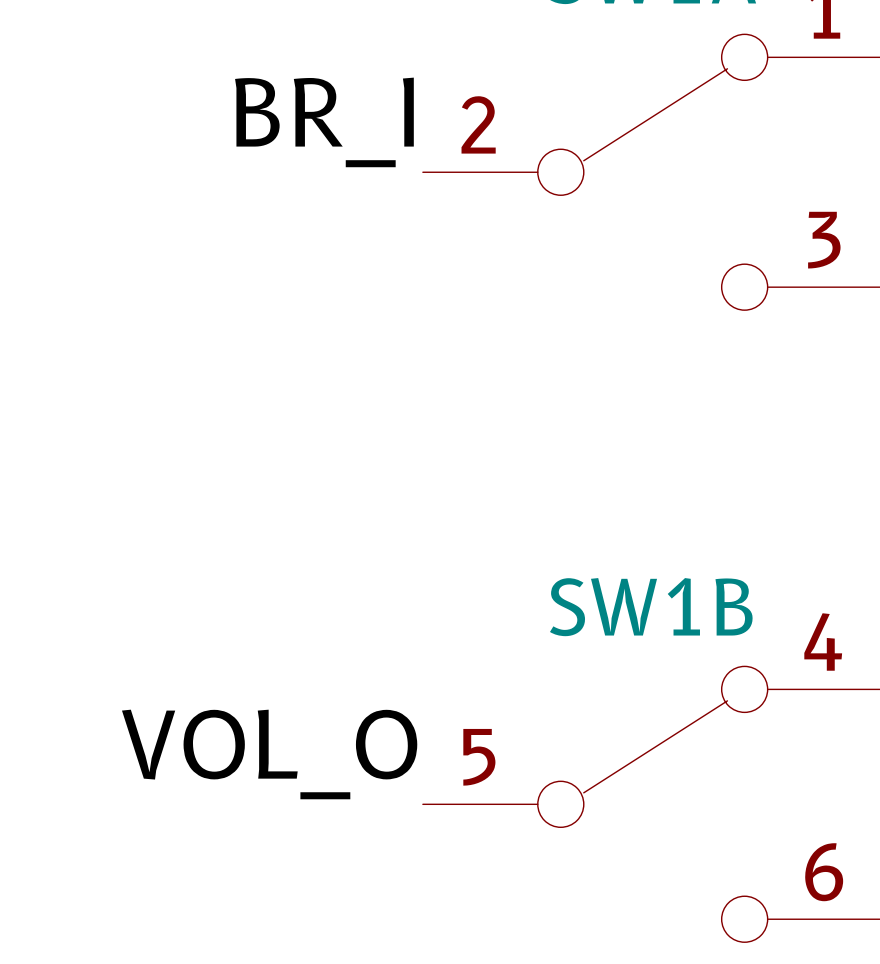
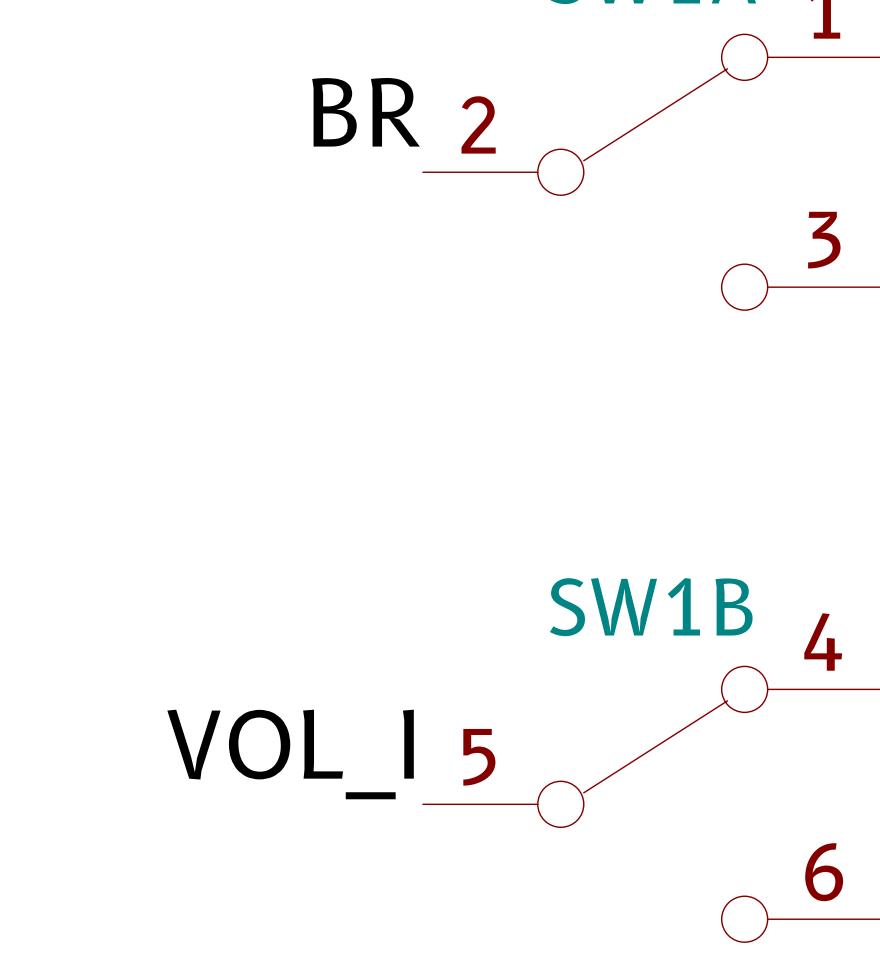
label: BR_I (324, 122) -> BR (366, 112)
label: VOL_O (269, 754) -> VOL_I (290, 754)

